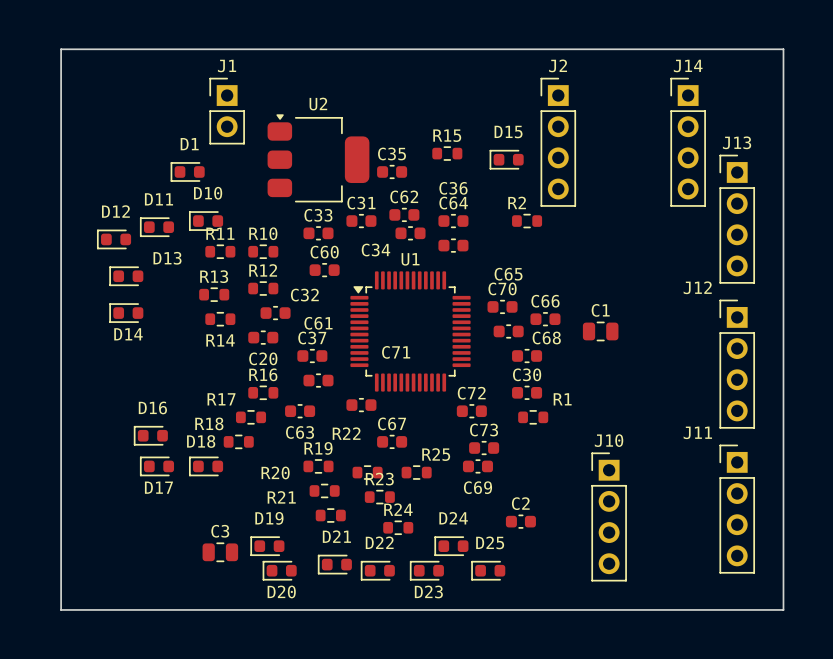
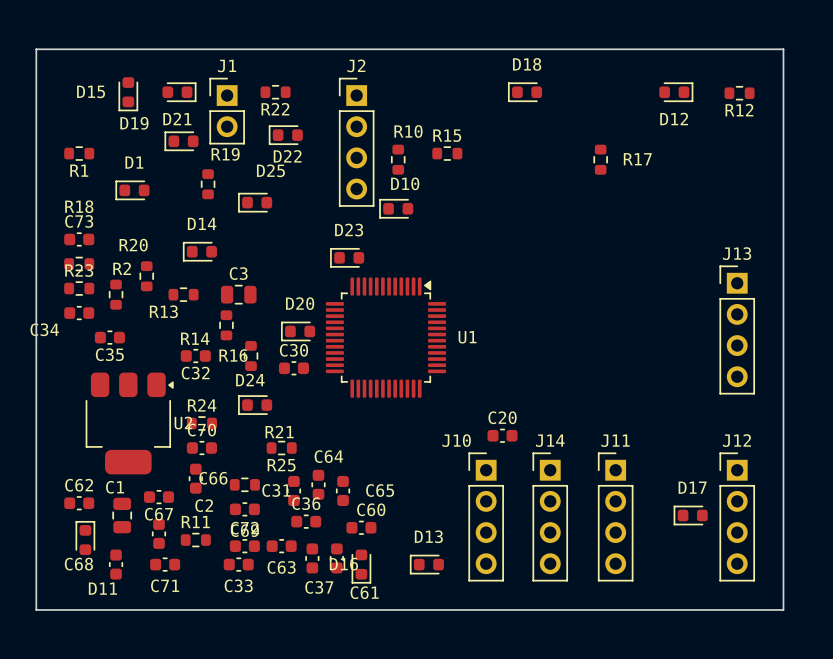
board edge: (61, 49) (61, 609) -> (61, 49) (36, 49) (36, 609) (61, 609)
J2 position: (558, 142) -> (356, 142)
J14 position: (688, 142) -> (550, 516)
C35 name position: C35 (392, 153) -> C35 (109, 354)
U2 rotation: 0° (318, 158) -> 90° clockwise (129, 423)
U2 position: (318, 158) -> (129, 423)
D15 rotation: 0° (506, 159) -> 90° counterclockwise (128, 94)
D15 position: (506, 159) -> (128, 94)
D1 position: (187, 171) -> (132, 190)
C35 position: (392, 171) -> (109, 337)
C36 name position: C36 (453, 188) -> C36 (306, 503)
D10 name position: D10 (208, 193) -> D10 (405, 183)
D11 name position: D11 (158, 199) -> D11 (102, 588)
C31 name position: C31 (361, 203) -> C31 (276, 490)
C62 position: (404, 214) -> (79, 503)
C33 name position: C33 (318, 215) -> C33 (238, 585)
J13 position: (737, 219) -> (737, 329)
D10 position: (206, 221) -> (396, 208)
C31 rotation: 0° (361, 221) -> 90° clockwise (293, 490)
C31 position: (361, 221) -> (293, 490)
C64 rotation: 0° (453, 221) -> 90° clockwise (318, 484)
C64 position: (453, 221) -> (318, 484)
R2 rotation: 0° (527, 221) -> 90° clockwise (146, 276)
R2 position: (527, 221) -> (146, 276)
D11 rotation: 0° (157, 227) -> 90° clockwise (85, 538)
D11 position: (157, 227) -> (85, 538)
C33 position: (318, 233) -> (238, 564)
C34 position: (410, 233) -> (79, 313)
D12 rotation: 0° (114, 239) -> 180° (676, 92)
D12 position: (114, 239) -> (676, 92)
C36 position: (453, 245) -> (306, 521)
R11 position: (220, 251) -> (195, 540)
R10 rotation: 0° (263, 251) -> 90° clockwise (398, 159)
R10 position: (263, 251) -> (398, 159)
C60 name position: C60 (324, 252) -> C60 (371, 509)
D13 name position: D13 (167, 258) -> D13 (428, 536)
R12 name position: R12 (263, 270) -> R12 (739, 110)
C60 position: (324, 270) -> (361, 527)
D13 position: (126, 276) -> (426, 564)
R13 name position: R13 (214, 276) -> R13 (163, 311)
J12 name position: J12 (697, 287) -> J12 (736, 440)
R12 position: (263, 288) -> (739, 93)
R13 position: (214, 294) -> (183, 294)
C32 name position: C32 (304, 295) -> C32 (195, 373)
C70 position: (502, 306) -> (201, 448)
D14 position: (126, 313) -> (199, 251)
C32 position: (275, 313) -> (195, 356)
R14 rotation: 0° (220, 319) -> 90° clockwise (226, 325)
C66 rotation: 0° (545, 319) -> 90° clockwise (195, 478)
C66 position: (545, 319) -> (195, 478)
C61 name position: C61 (318, 323) -> C61 (364, 592)
U1 rotation: 0° (410, 331) -> 90° clockwise (385, 337)
C65 rotation: 0° (508, 331) -> 90° clockwise (343, 490)
C65 position: (508, 331) -> (343, 490)
C1 rotation: 0° (600, 331) -> 90° clockwise (122, 515)
C1 position: (600, 331) -> (122, 515)
D14 name position: D14 (128, 334) -> D14 (202, 223)
C20 position: (263, 337) -> (502, 435)
C37 name position: C37 (312, 338) -> C37 (319, 587)
C68 name position: C68 (546, 338) -> C68 (78, 564)
C71 name position: C71 (396, 352) -> C71 (165, 585)
C37 rotation: 0° (312, 356) -> 90° clockwise (336, 558)
C37 position: (312, 356) -> (336, 558)
C68 rotation: 0° (527, 356) -> 90° clockwise (116, 564)
C68 position: (527, 356) -> (116, 564)
C20 name position: C20 (263, 358) -> C20 (502, 417)
J12 position: (737, 364) -> (737, 516)
R16 name position: R16 (263, 374) -> R16 (233, 355)
C61 rotation: 0° (318, 380) -> 90° clockwise (312, 558)
C61 position: (318, 380) -> (312, 558)
R16 rotation: 0° (263, 392) -> 90° clockwise (251, 356)
R16 position: (263, 392) -> (251, 356)
C30 position: (527, 392) -> (293, 368)
R17 name position: R17 (221, 399) -> R17 (637, 159)
R1 name position: R1 (562, 399) -> R1 (79, 170)
C71 position: (361, 405) -> (165, 564)
C63 position: (300, 411) -> (281, 546)
C72 position: (471, 411) -> (244, 546)
R17 rotation: 0° (251, 417) -> 90° clockwise (600, 159)
R17 position: (251, 417) -> (600, 159)
R1 position: (533, 417) -> (79, 153)
R18 name position: R18 (209, 423) -> R18 (79, 206)
C67 name position: C67 (392, 423) -> C67 (158, 514)
J11 name position: J11 (697, 432) -> J11 (615, 440)
R22 name position: R22 (346, 433) -> R22 (275, 109)
D16 rotation: 0° (150, 435) -> 90° counterclockwise (361, 566)
D16 position: (150, 435) -> (361, 566)
J10 name position: J10 (609, 440) -> J10 (456, 440)
D18 name position: D18 (201, 441) -> D18 (527, 64)
R18 position: (238, 441) -> (79, 263)
C67 position: (392, 441) -> (159, 497)
C73 position: (484, 448) -> (79, 239)
R25 name position: R25 (436, 454) -> R25 (281, 465)
D17 position: (157, 466) -> (690, 515)
D18 position: (206, 466) -> (525, 92)
R19 rotation: 0° (318, 466) -> 90° clockwise (208, 184)
R19 position: (318, 466) -> (208, 184)
C69 position: (477, 466) -> (244, 509)
R22 position: (367, 472) -> (275, 92)
R25 position: (416, 472) -> (281, 448)
D17 name position: D17 (158, 487) -> D17 (692, 487)
R20 rotation: 0° (324, 490) -> 90° clockwise (116, 294)
R20 position: (324, 490) -> (116, 294)
R21 name position: R21 (281, 497) -> R21 (279, 432)
R23 position: (379, 497) -> (79, 288)
C2 name position: C2 (520, 503) -> C2 (204, 505)
J11 position: (737, 509) -> (615, 516)
R21 position: (330, 515) -> (244, 484)
J10 position: (609, 516) -> (486, 516)
D19 name position: D19 (269, 518) -> D19 (134, 123)
D24 name position: D24 (453, 518) -> D24 (250, 380)
C2 rotation: 0° (520, 521) -> 90° clockwise (159, 533)
C2 position: (520, 521) -> (159, 533)
R24 position: (398, 527) -> (201, 423)
D22 name position: D22 (379, 542) -> D22 (287, 156)
D25 name position: D25 (490, 542) -> D25 (270, 170)
D19 position: (267, 546) -> (181, 141)
D24 position: (451, 546) -> (255, 405)
C3 position: (220, 552) -> (238, 294)
D21 rotation: 0° (334, 564) -> 180° (179, 92)
D21 position: (334, 564) -> (179, 92)
D20 position: (279, 570) -> (298, 331)
D22 position: (377, 570) -> (285, 135)
D23 position: (426, 570) -> (347, 257)
D25 position: (488, 570) -> (255, 202)
D20 name position: D20 (281, 591) -> D20 (300, 303)
D23 name position: D23 (428, 591) -> D23 (349, 230)

